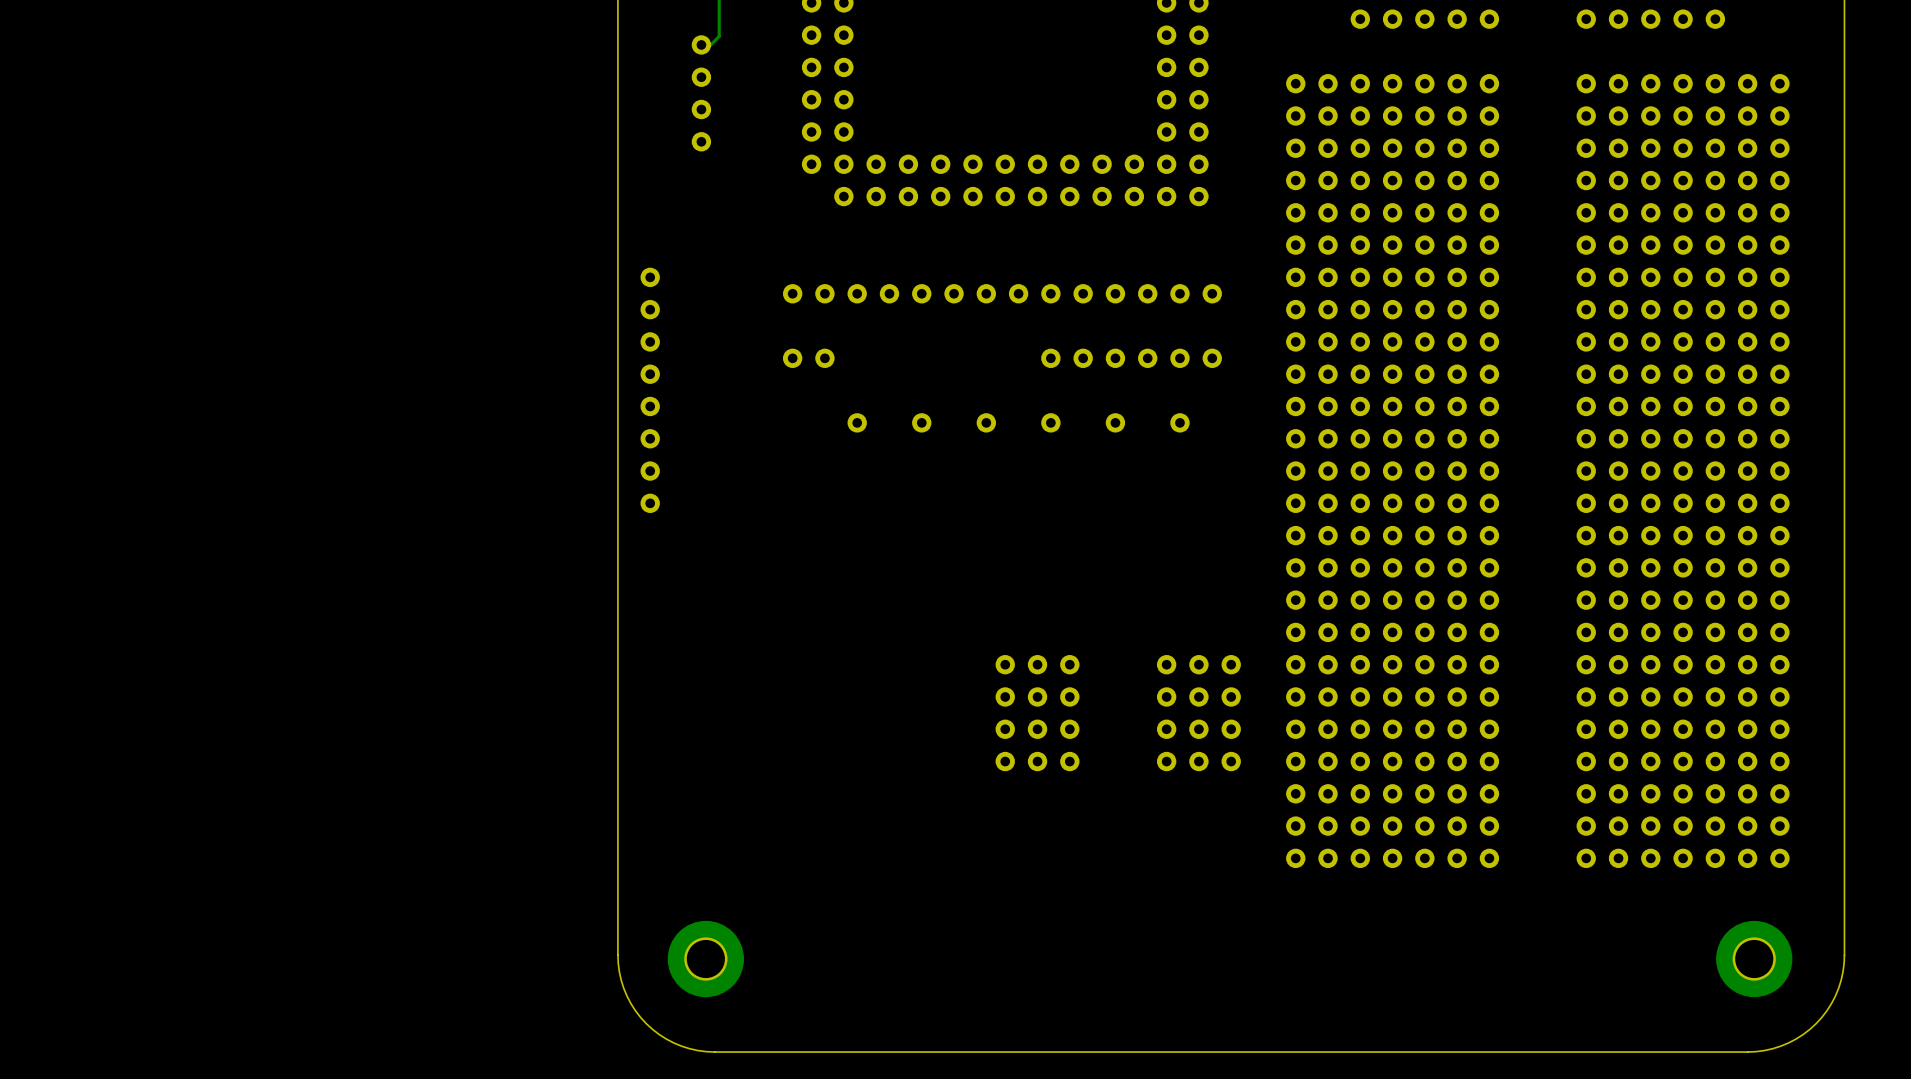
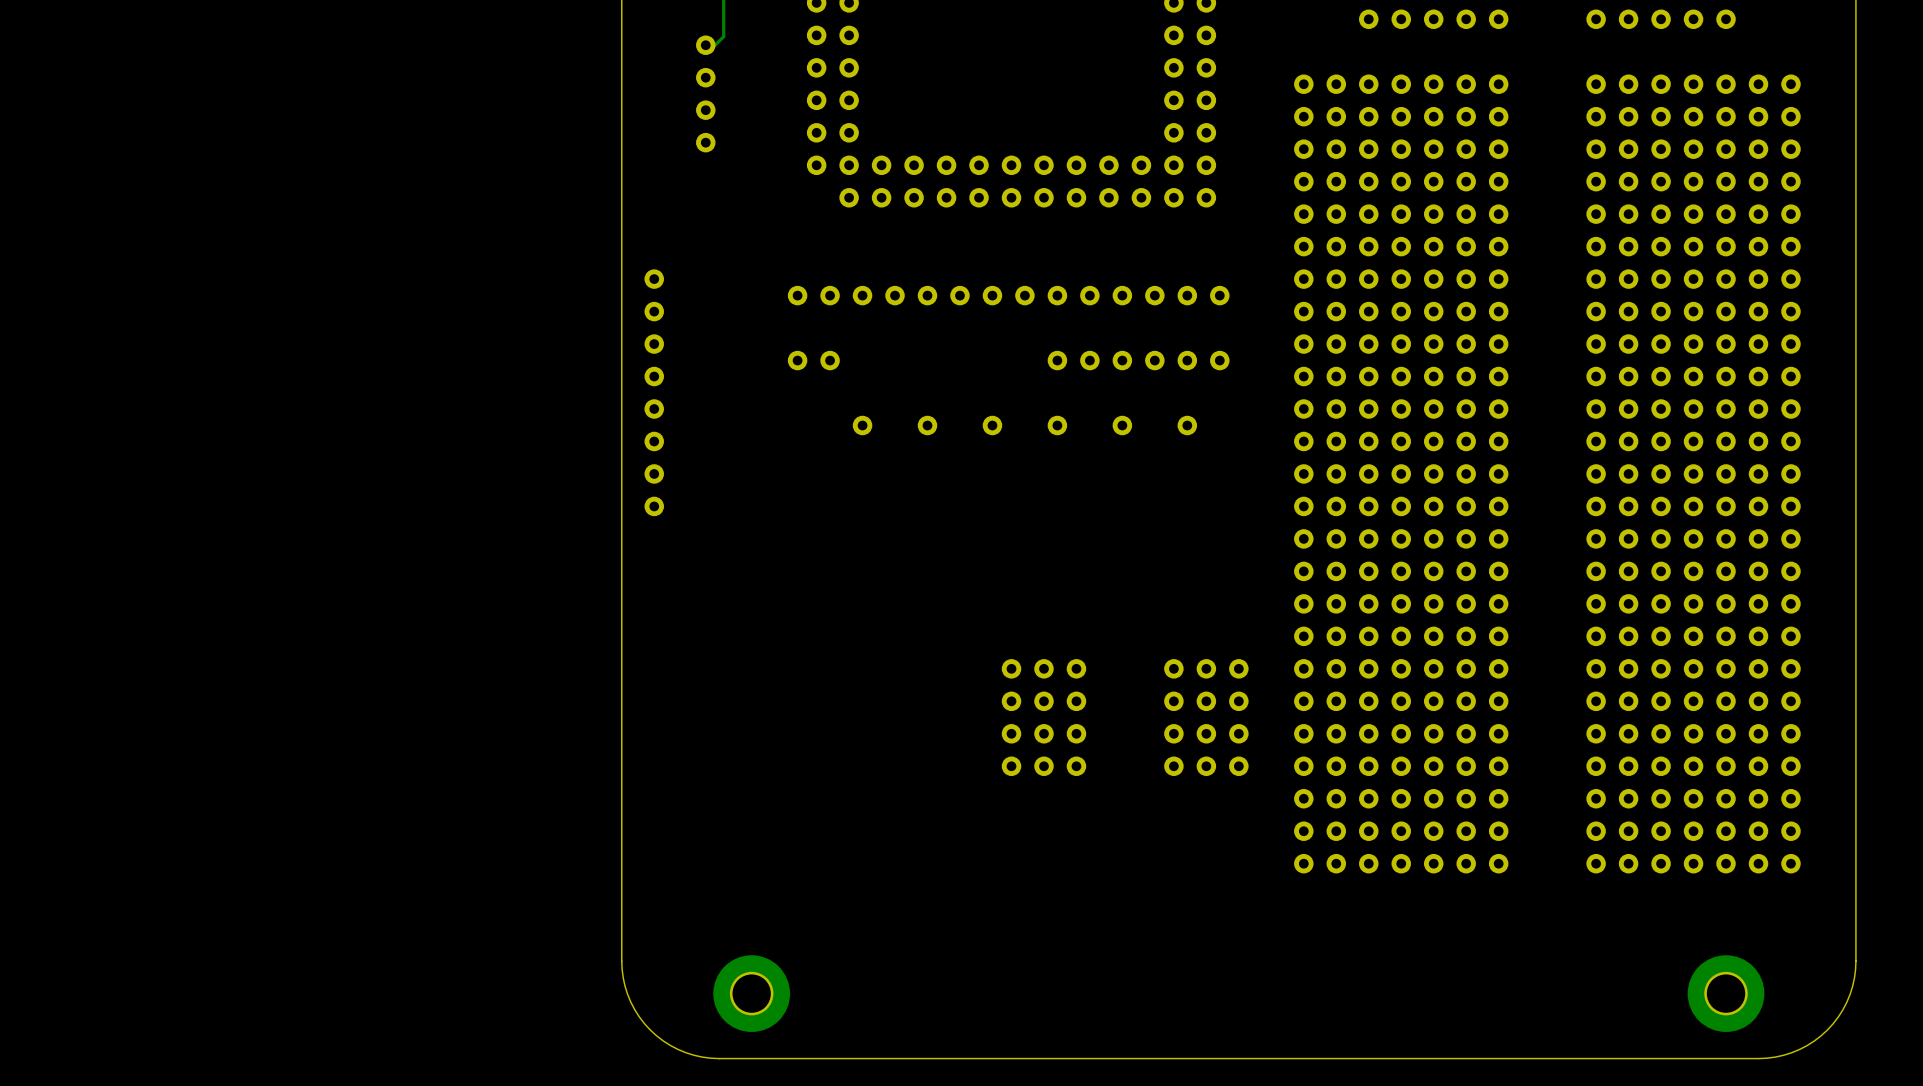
part position: (705, 959) -> (751, 993)
part position: (1754, 959) -> (1726, 993)

